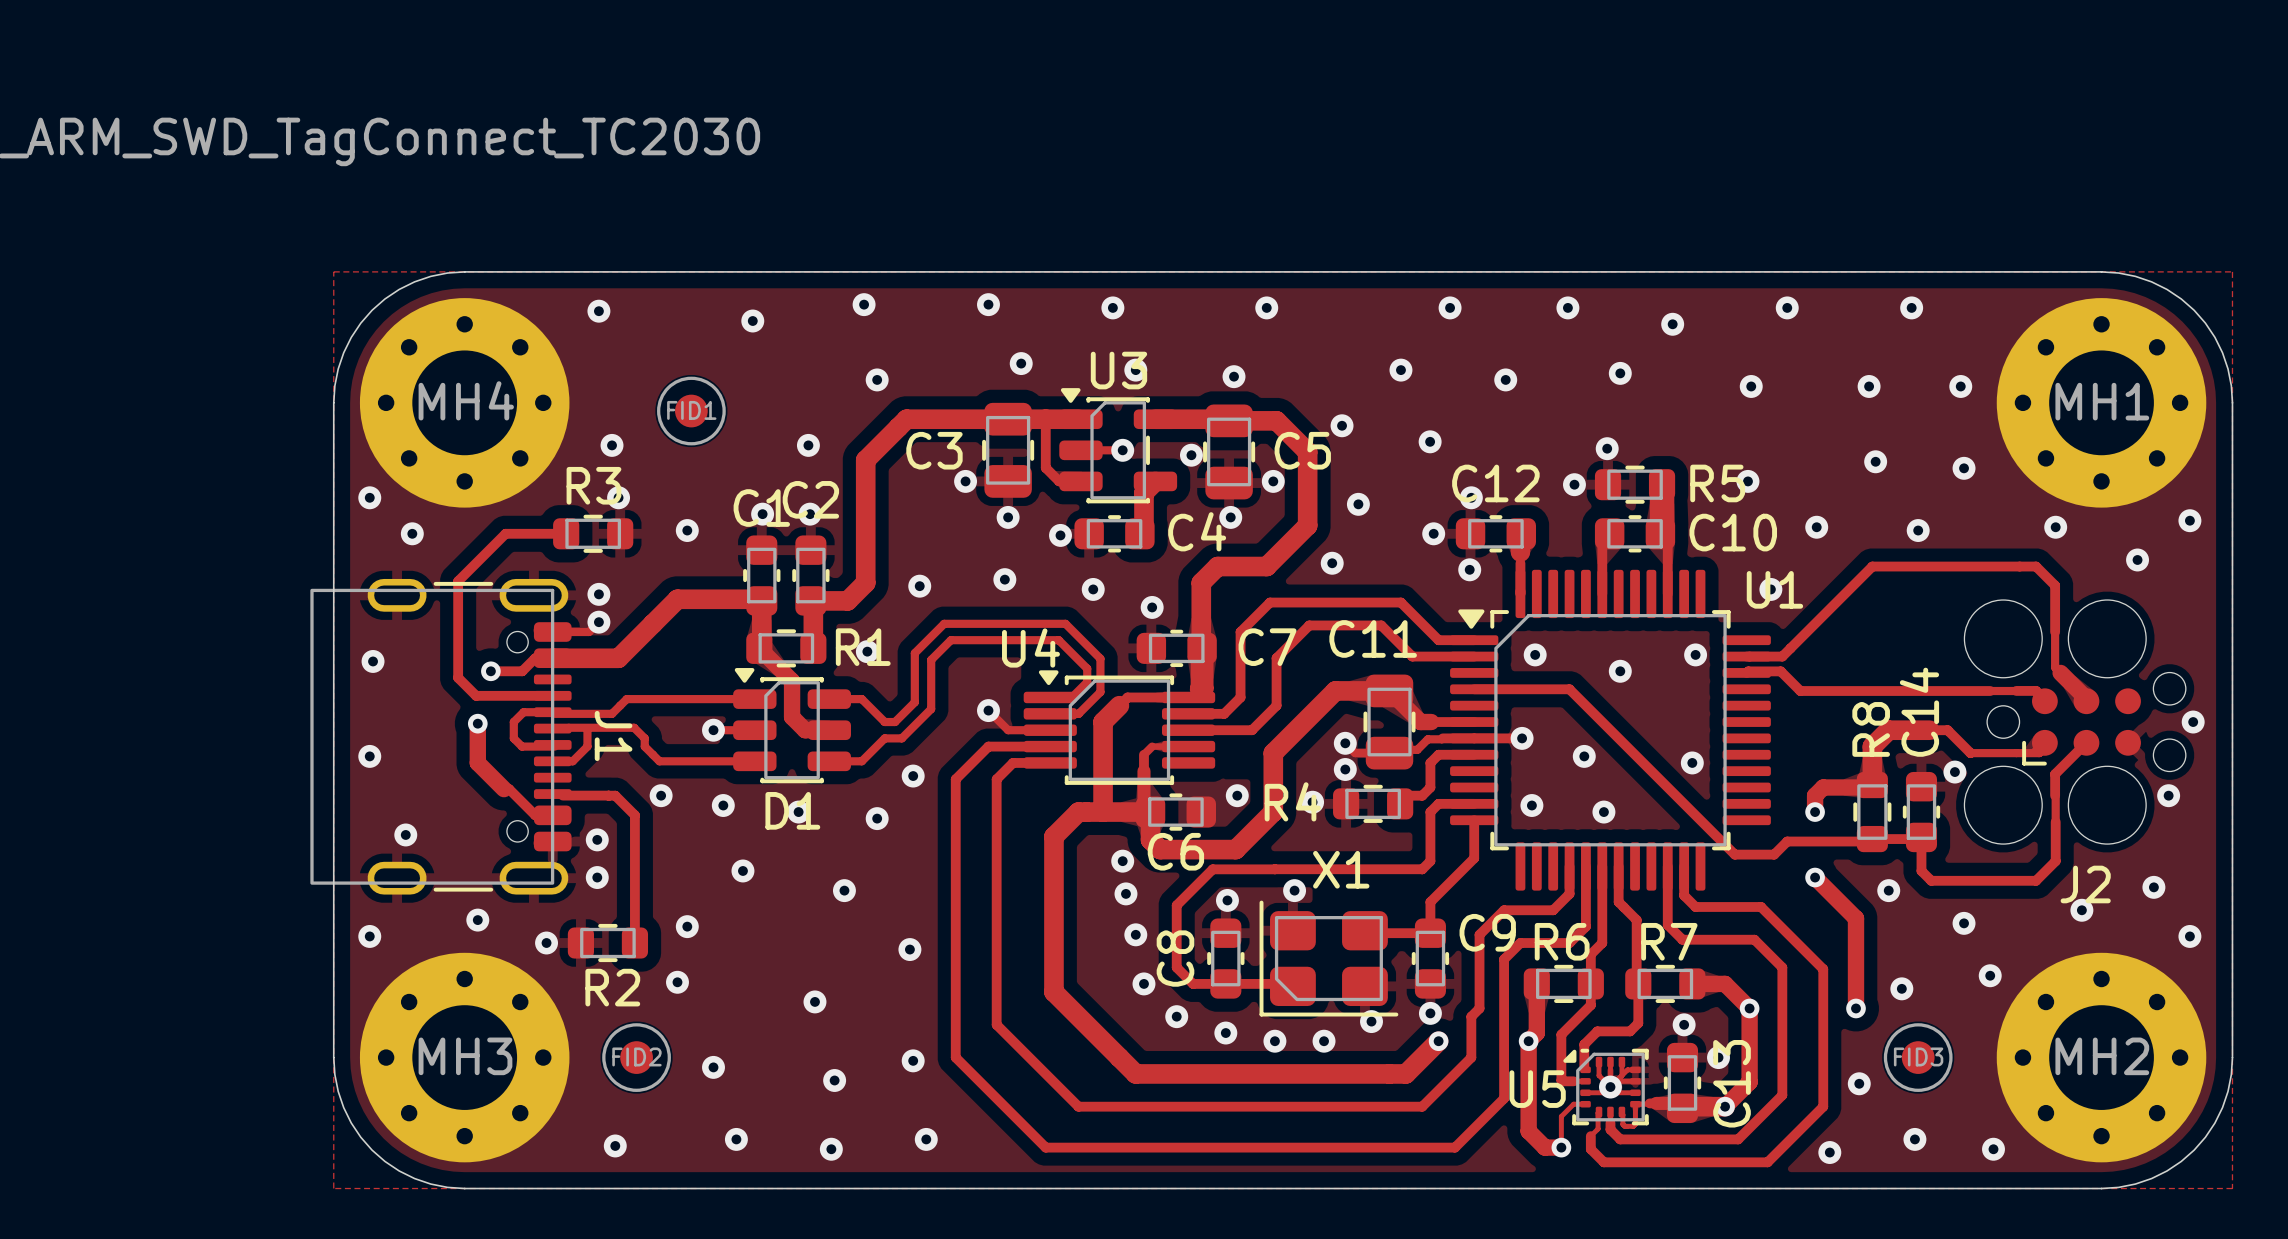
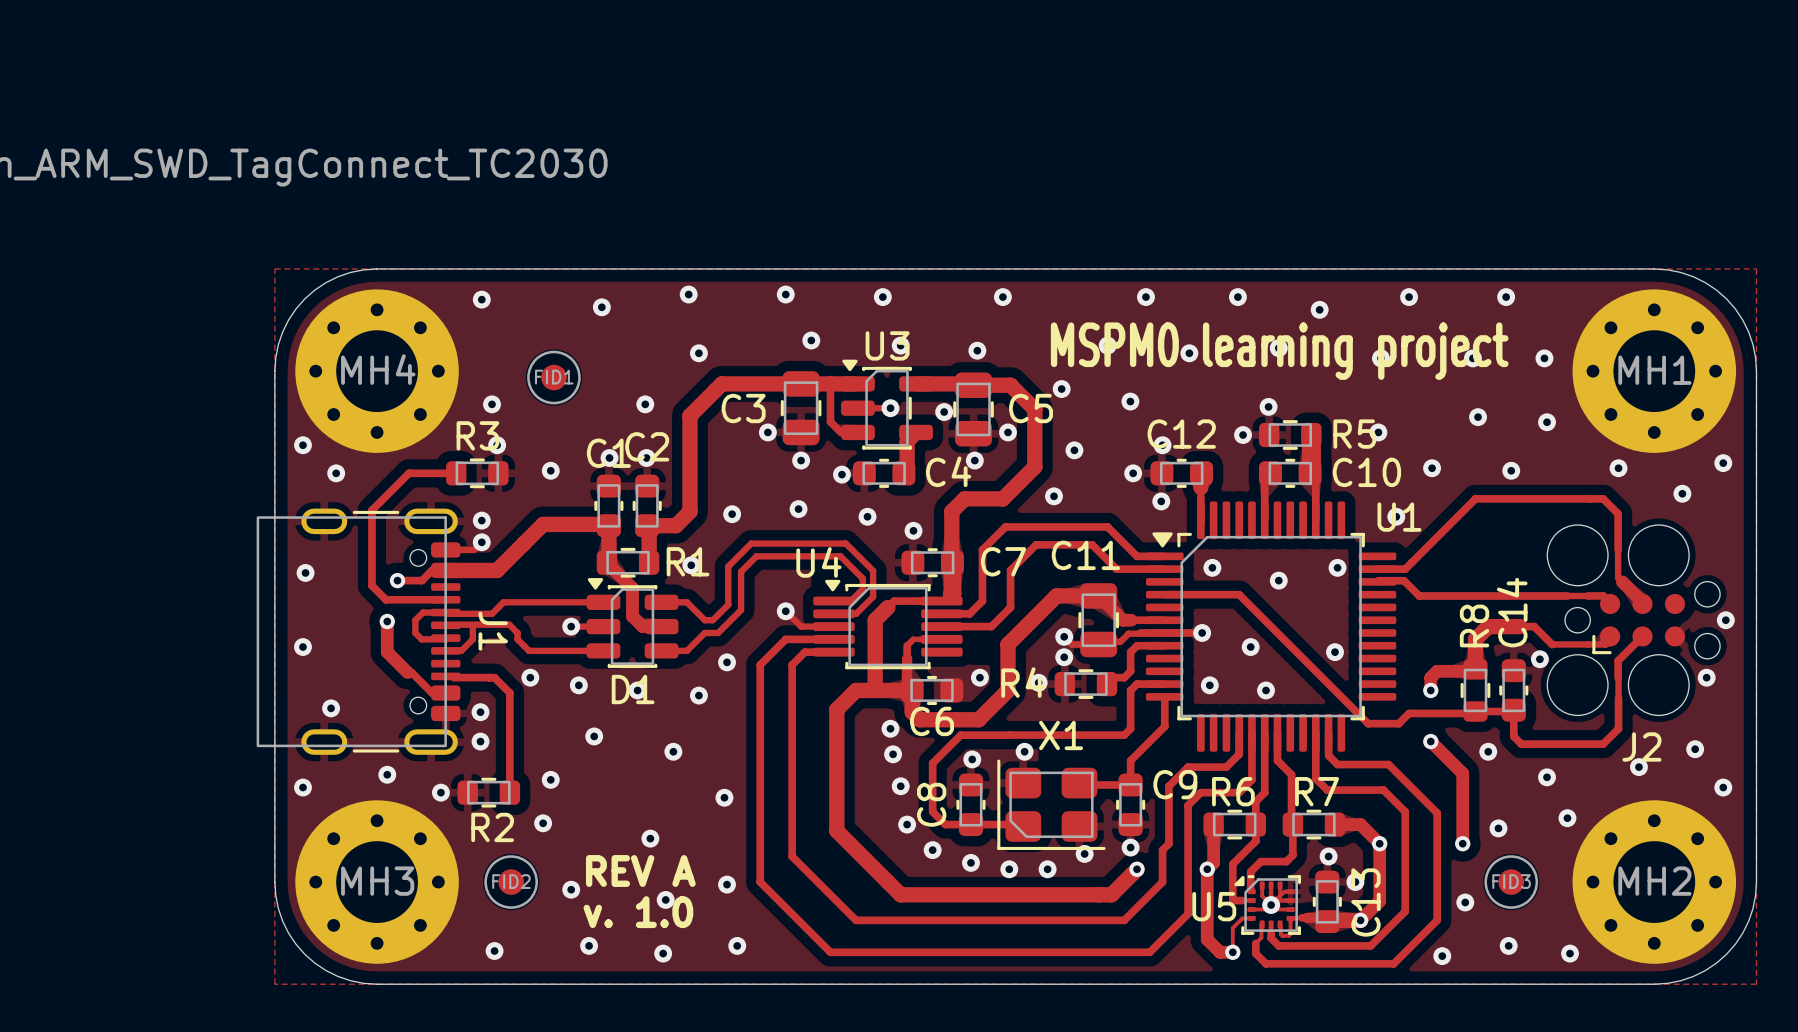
text: none -> MSPM0 learning project (1279, 351)
text: none -> REV A (640, 871)
text: none -> v. 1.0 (638, 912)

